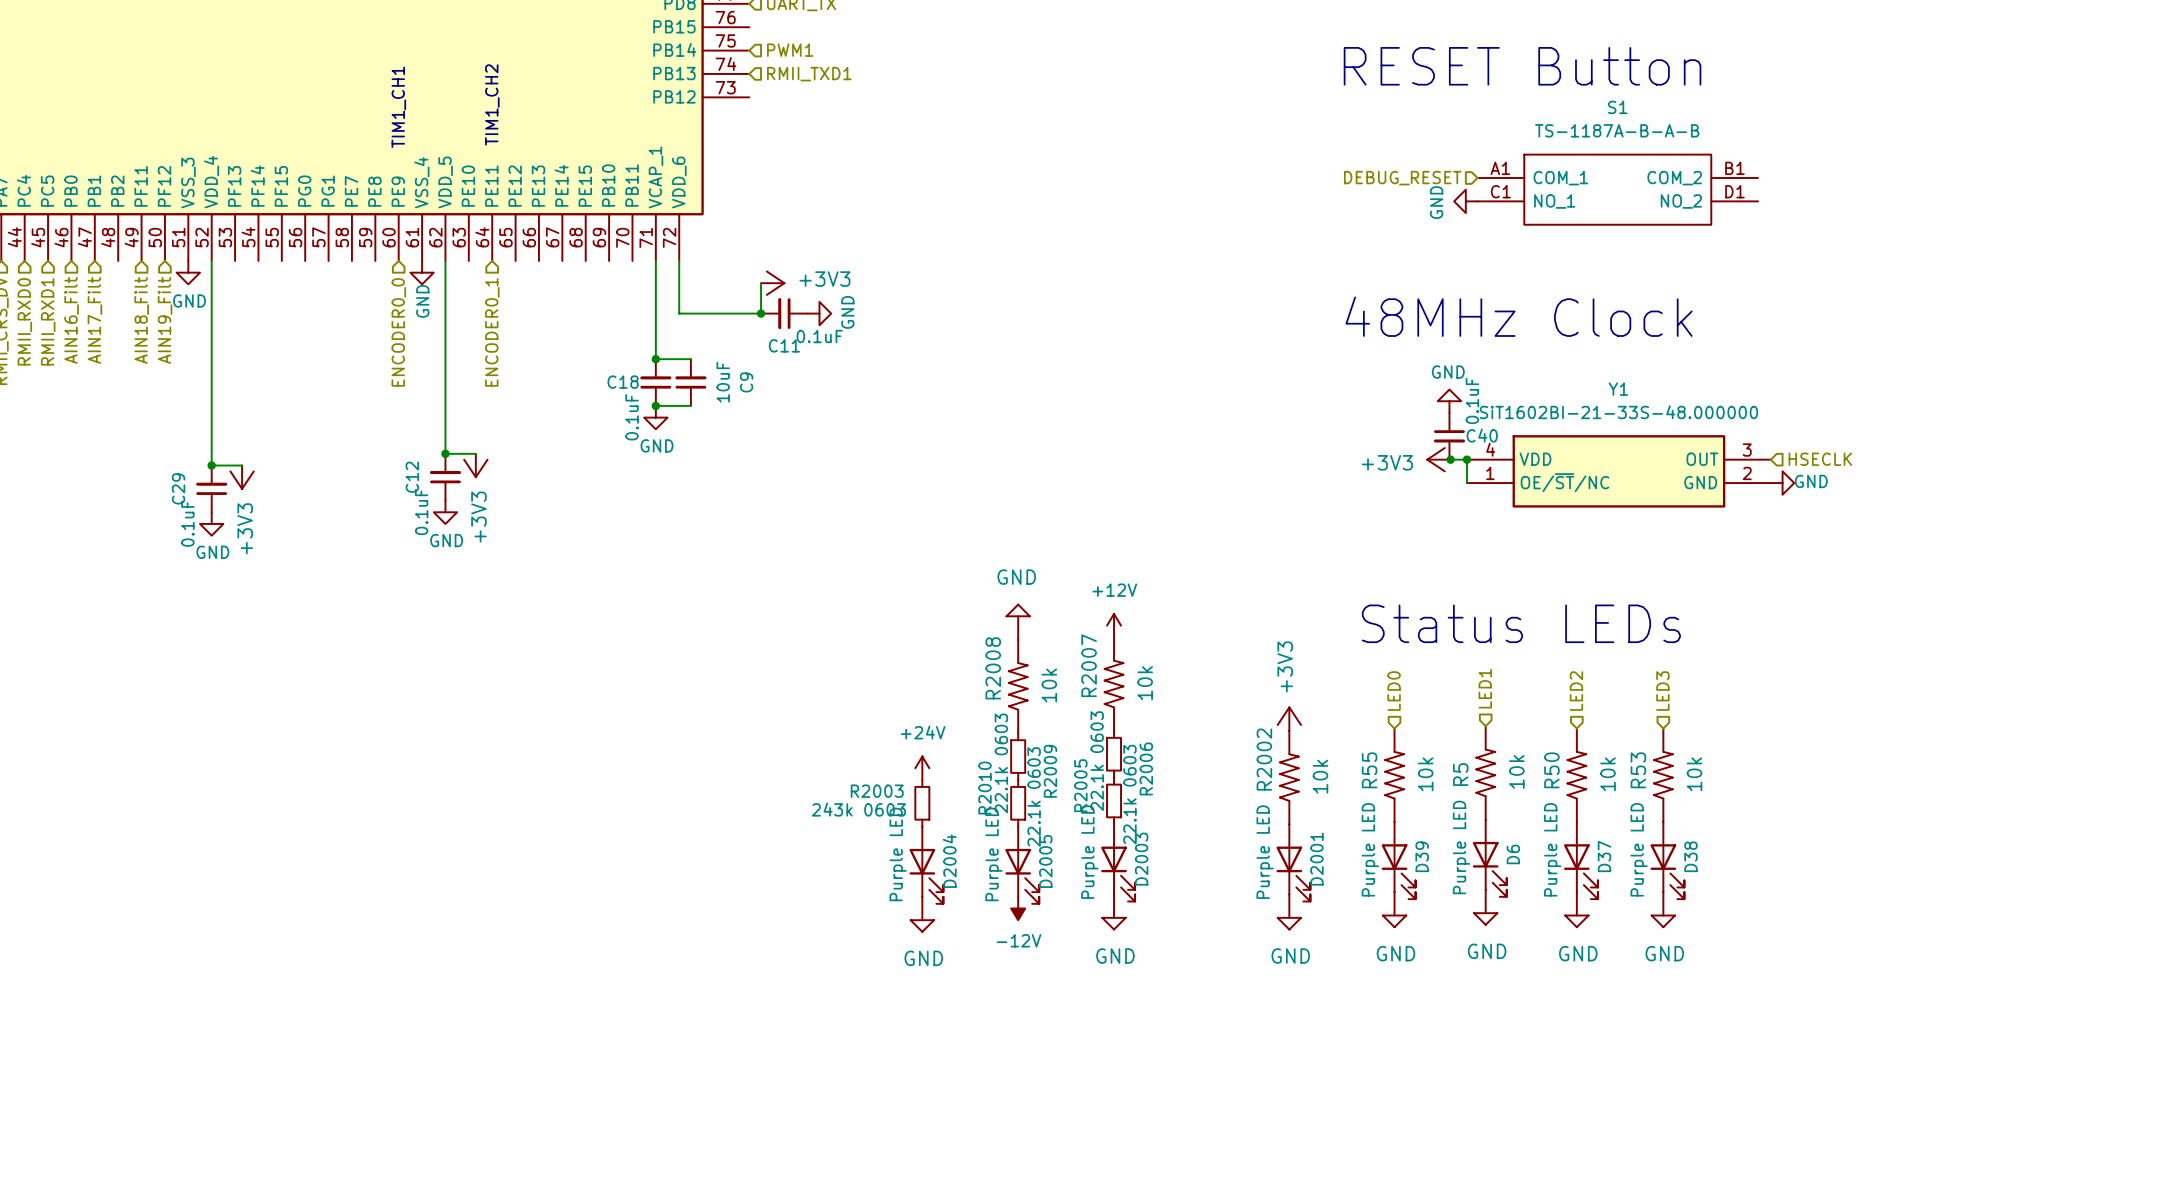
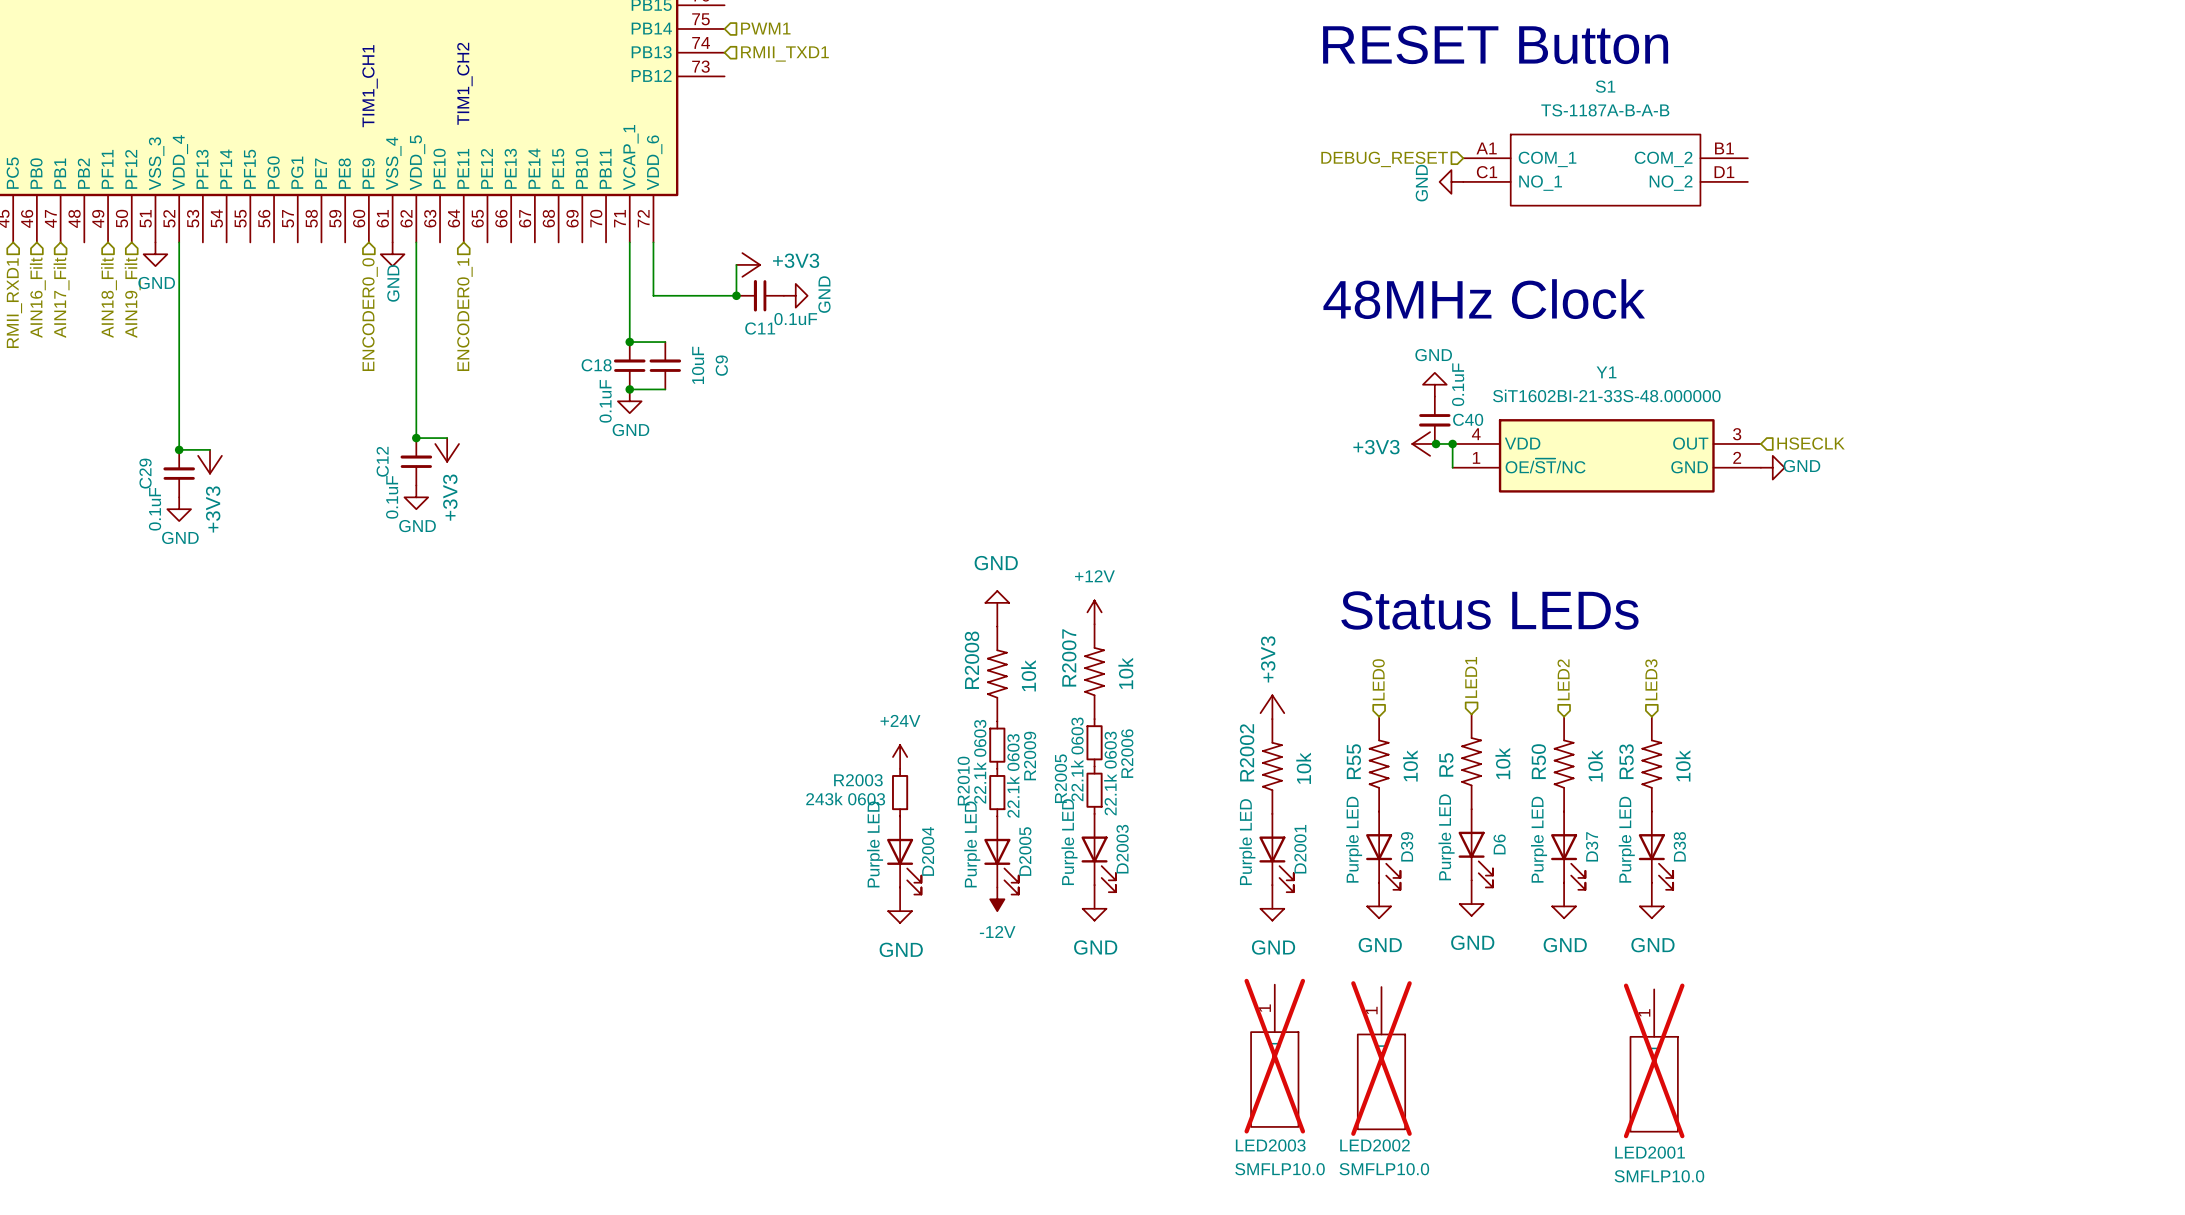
LED2003: none -> SMFLP10.0 (1274, 1056)
LED2002: none -> SMFLP10.0 (1381, 1058)
LED2001: none -> SMFLP10.0 (1654, 1060)

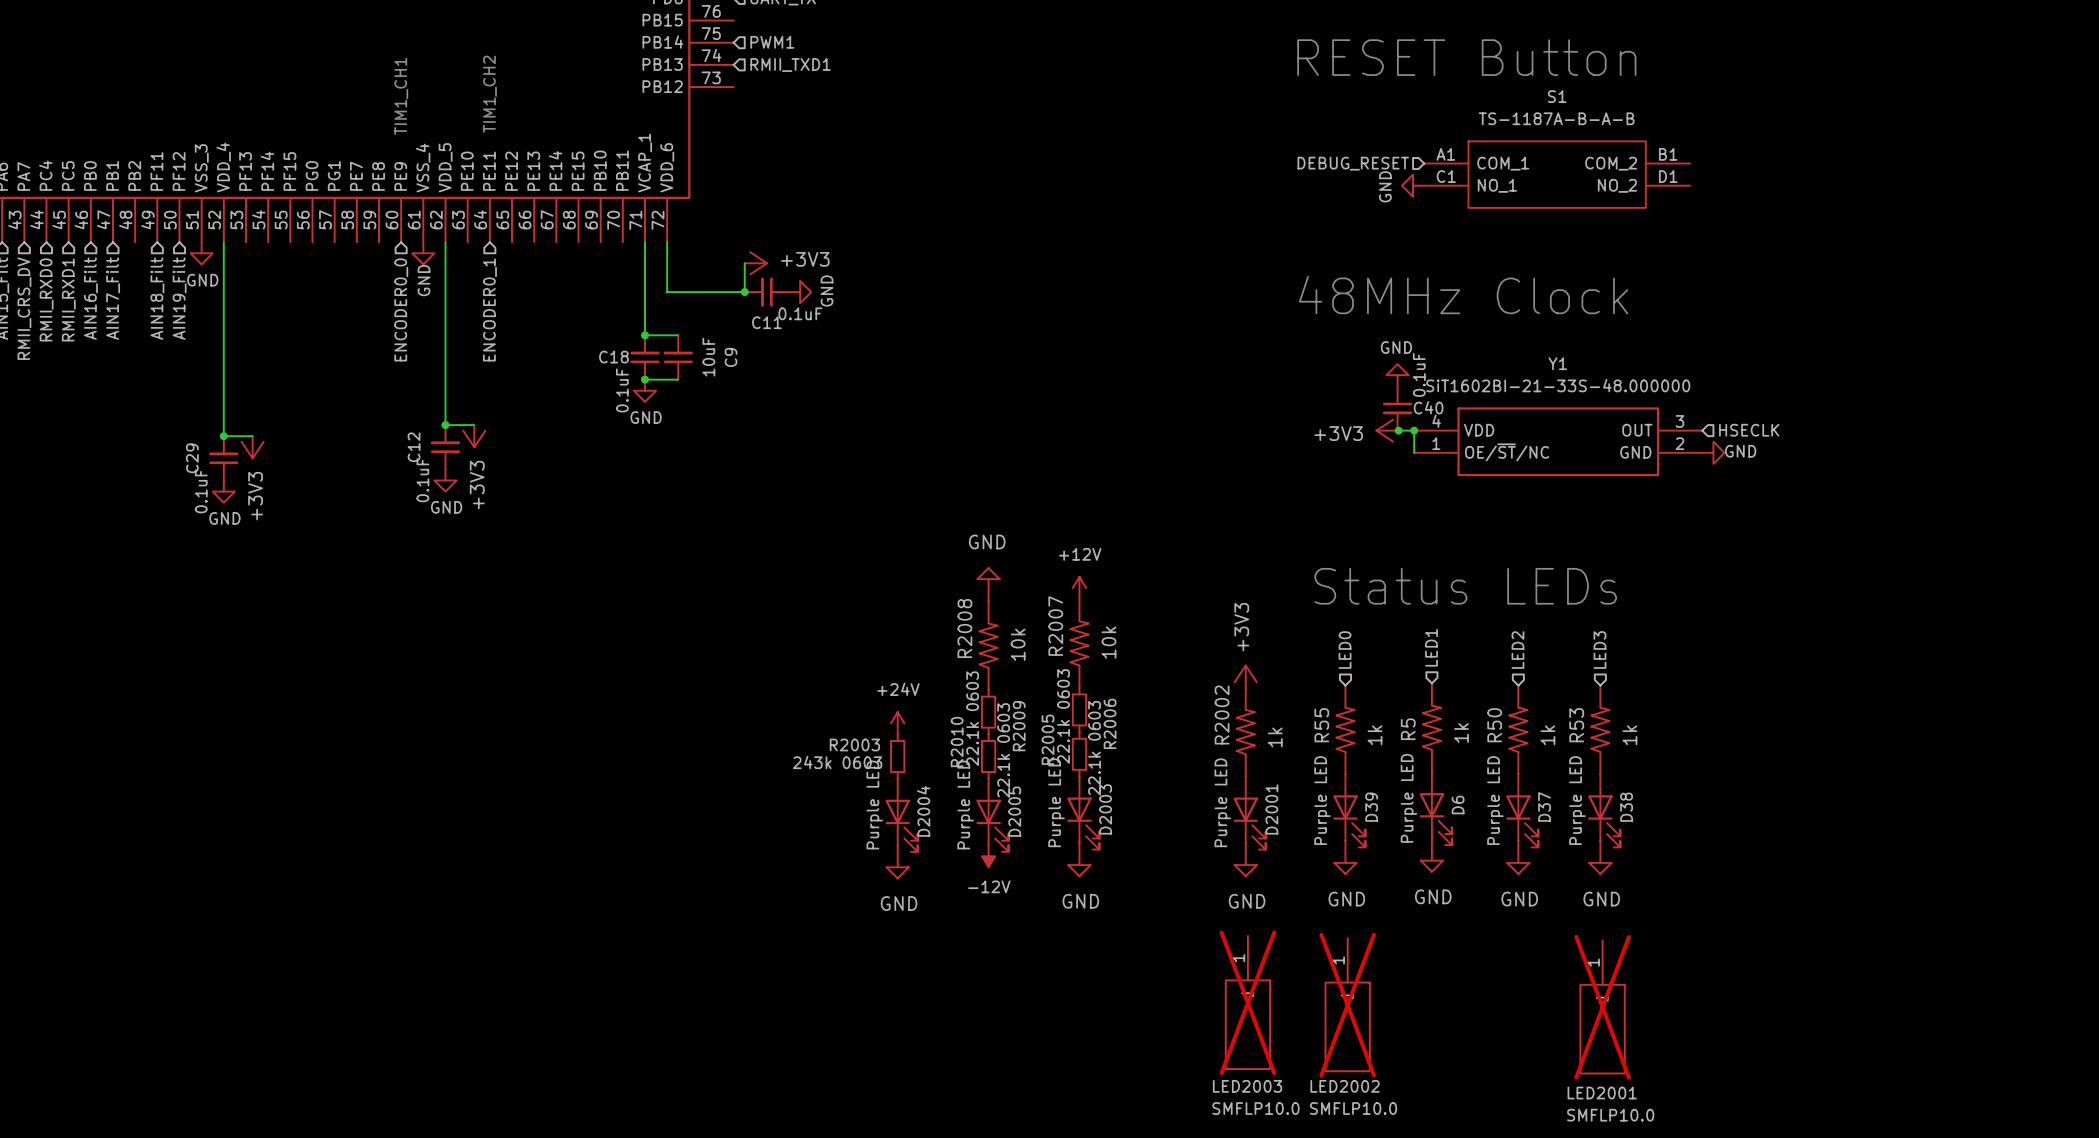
R5 value: 10k (1502, 763) -> 1k (1461, 733)
R55 value: 10k (1410, 765) -> 1k (1375, 735)
R50 value: 10k (1595, 765) -> 1k (1547, 735)
R53 value: 10k (1683, 765) -> 1k (1629, 735)
R2002 value: 10k (1303, 768) -> 1k (1275, 737)

